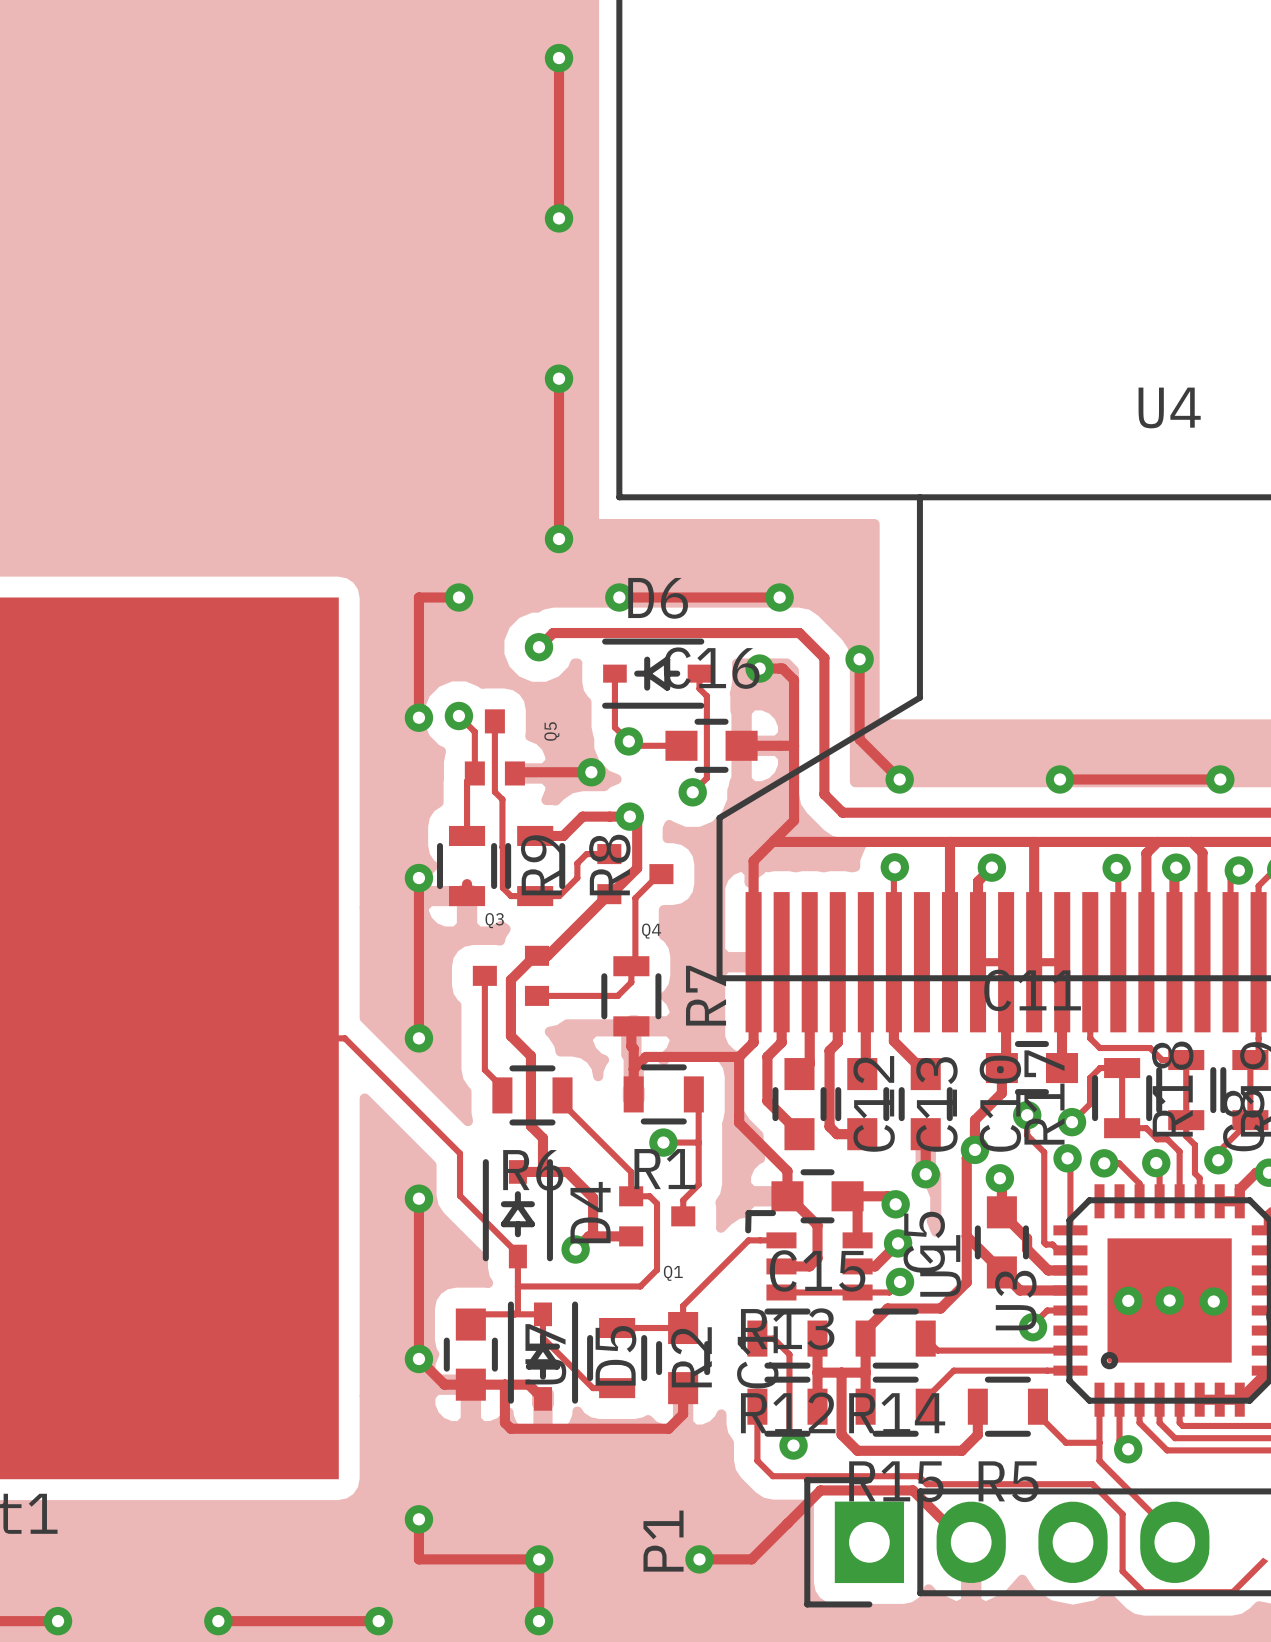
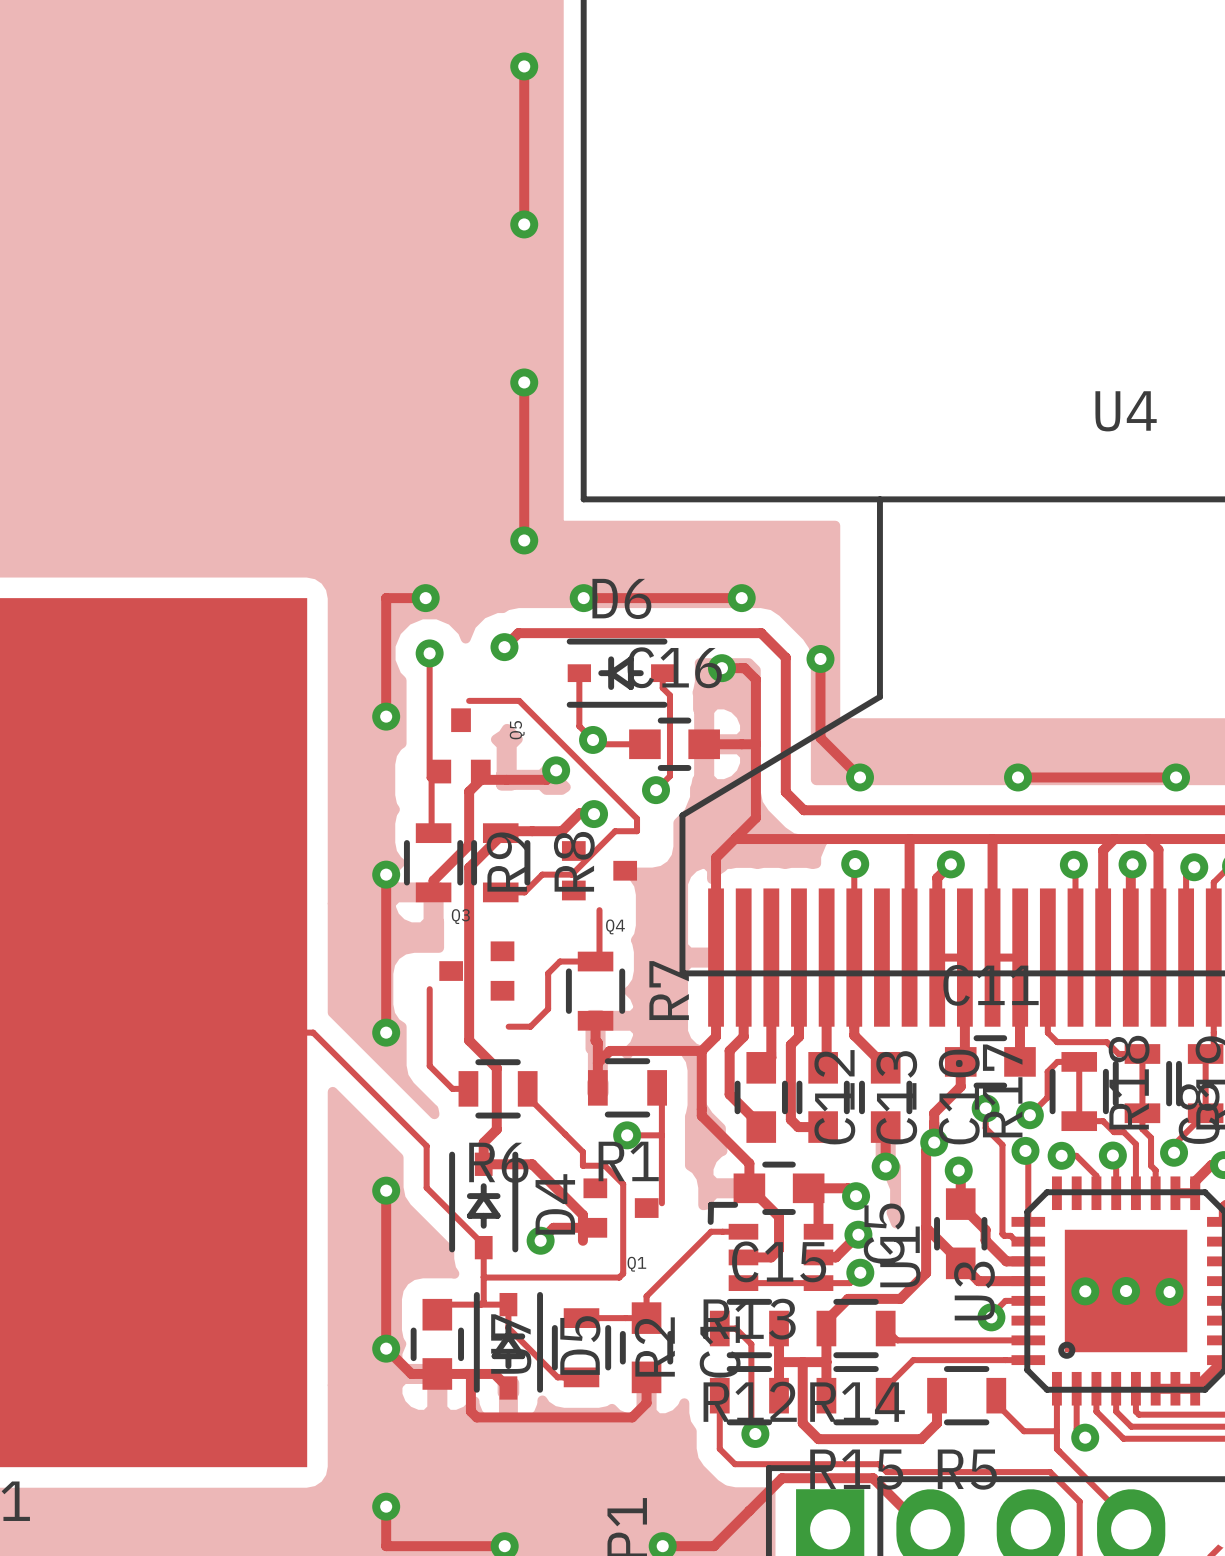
track: none -> (429, 653) (431, 831)
track: (458, 716) (474, 731) (474, 773) (467, 781) (467, 835) -> none
via position: (458, 716) -> (429, 653)
track: (494, 721) (494, 791) (502, 799) (502, 847) -> none
track: (591, 772) (514, 773) -> (556, 770) (546, 779) (480, 779) (469, 791) (469, 845) (433, 880)
track: (535, 835) (563, 835) (582, 816) (629, 816) (637, 823) (637, 868) (547, 955) (534, 955) (510, 979) (510, 1035) (530, 1056) (530, 1126) (542, 1138) (542, 1171) -> (500, 833) (502, 831) (561, 831) (580, 813) (595, 813)
track: none -> (500, 836) (469, 867) (469, 1040) (496, 1068) (496, 1129) (483, 1142) (483, 1164)
track: (502, 847) (502, 887) (511, 896) (535, 896) -> none
track: (609, 854) (586, 854) (577, 863) (577, 878) -> (469, 700) (519, 700) (637, 818) (637, 831) (615, 831) (571, 874) (542, 874)
track: (661, 874) (635, 898) (635, 914) -> none
track: (631, 966) (631, 982) (617, 995) (536, 995) -> (595, 961) (559, 961) (548, 973) (548, 1009) (530, 1026) (508, 1026)
track: (484, 975) (484, 1069) (502, 1087) (502, 1095) -> (429, 989) (429, 1066) (452, 1088) (468, 1088)
track: (618, 1159) (631, 1172) (631, 1196) (649, 1196) (657, 1203) (657, 1269) (640, 1286) (517, 1286) -> (582, 1152) (582, 1165) (604, 1165) (623, 1184) (623, 1273) (619, 1277) (484, 1277)
track: (698, 1184) (683, 1200) (683, 1216) -> (661, 1176) (661, 1203)
track: (593, 1197) (593, 1236) -> (557, 1189) (582, 1215) (582, 1240)

